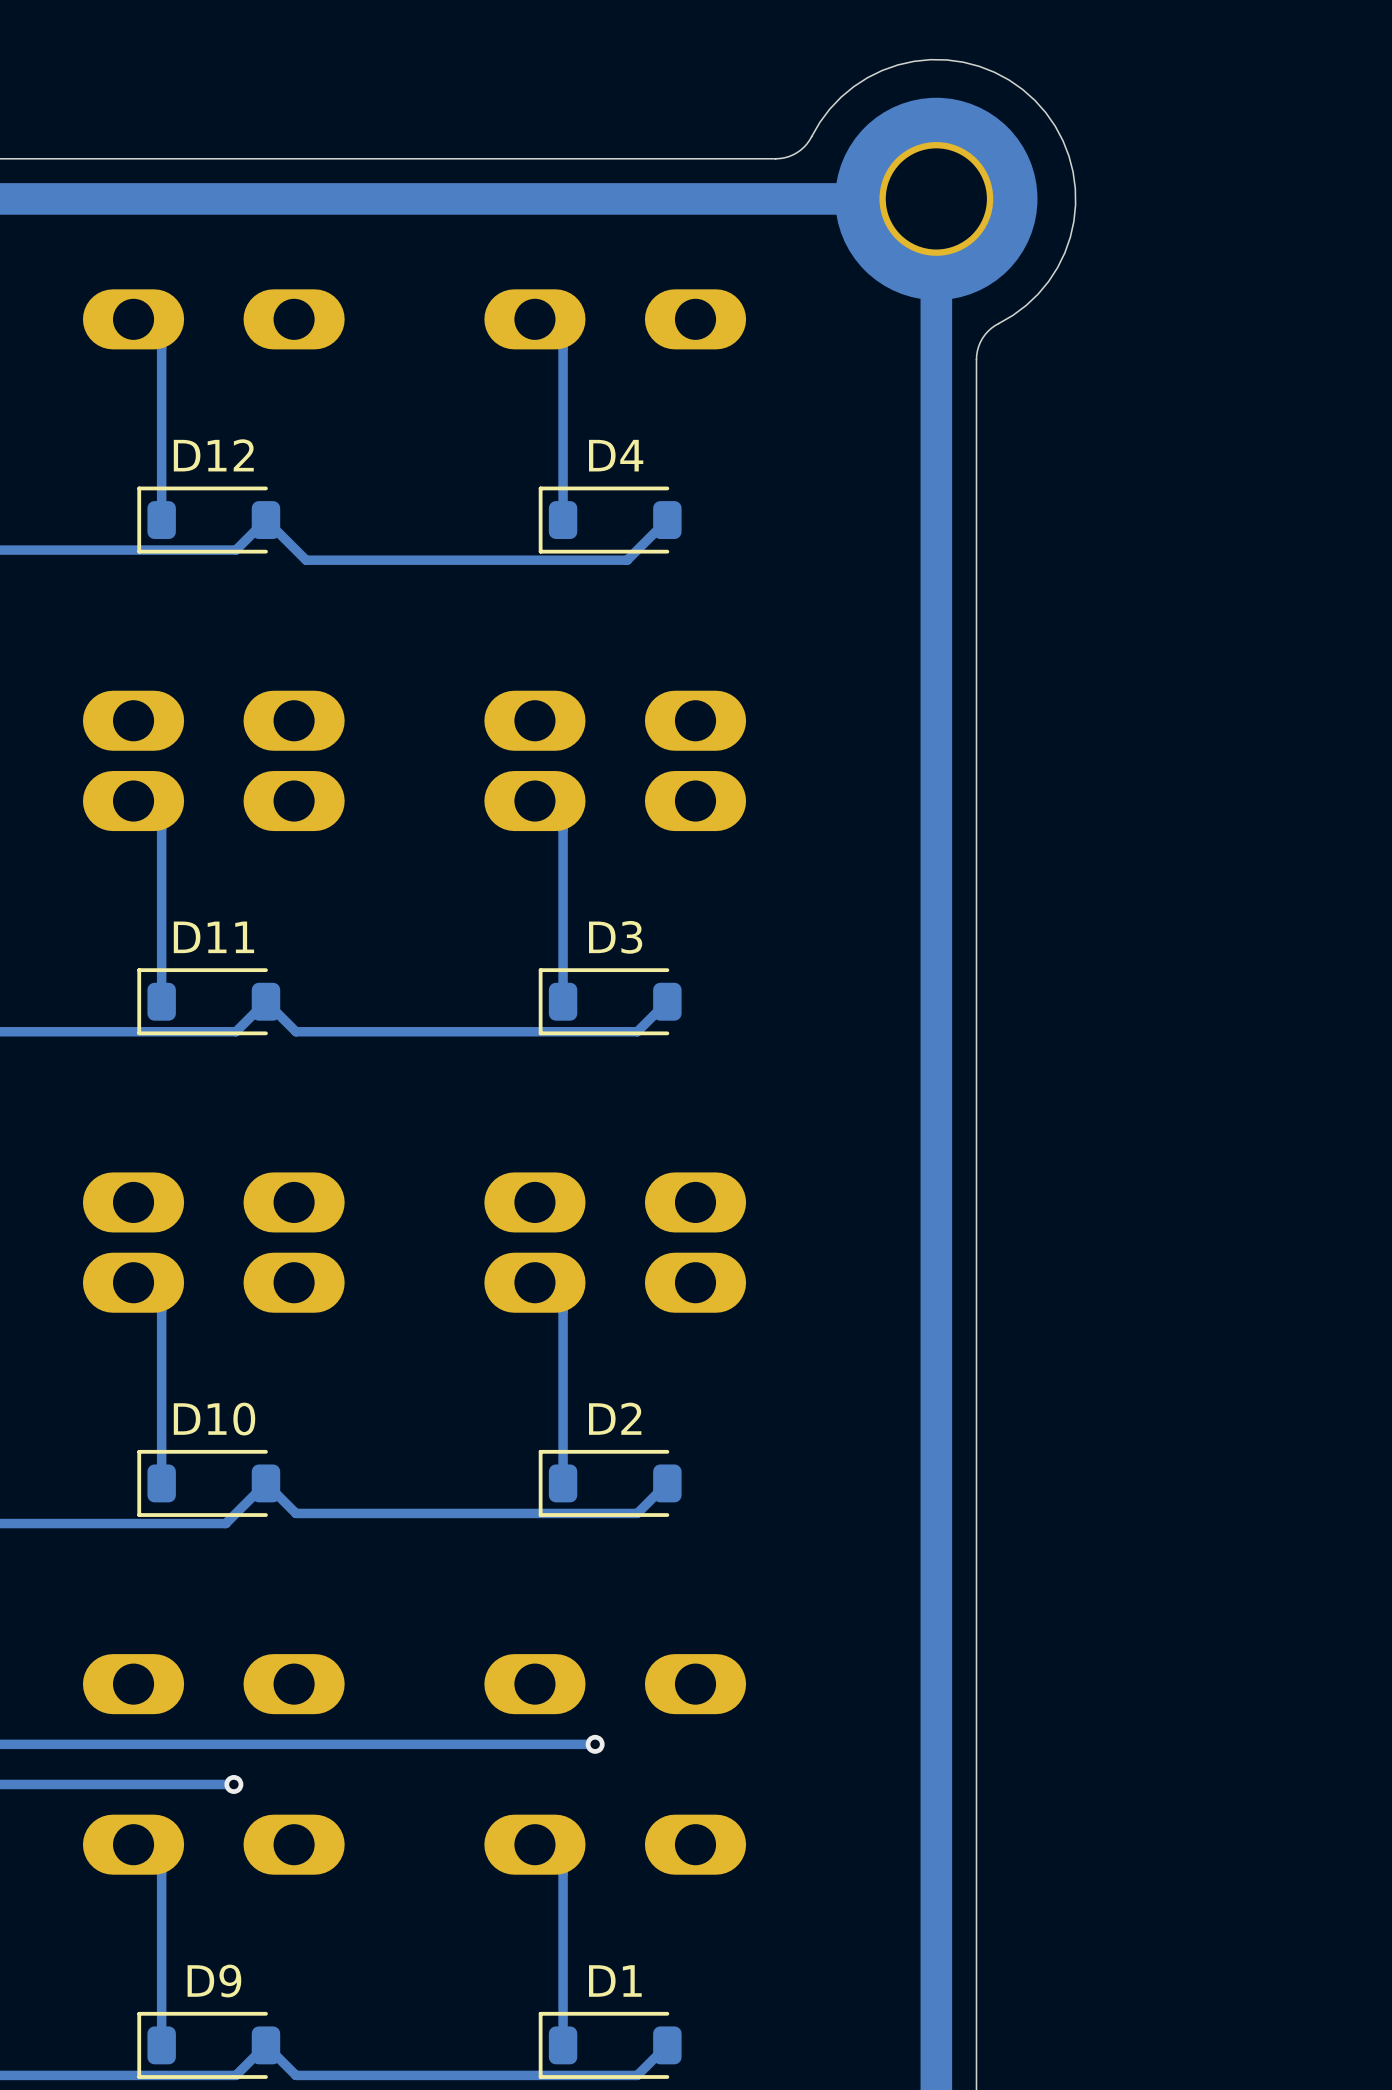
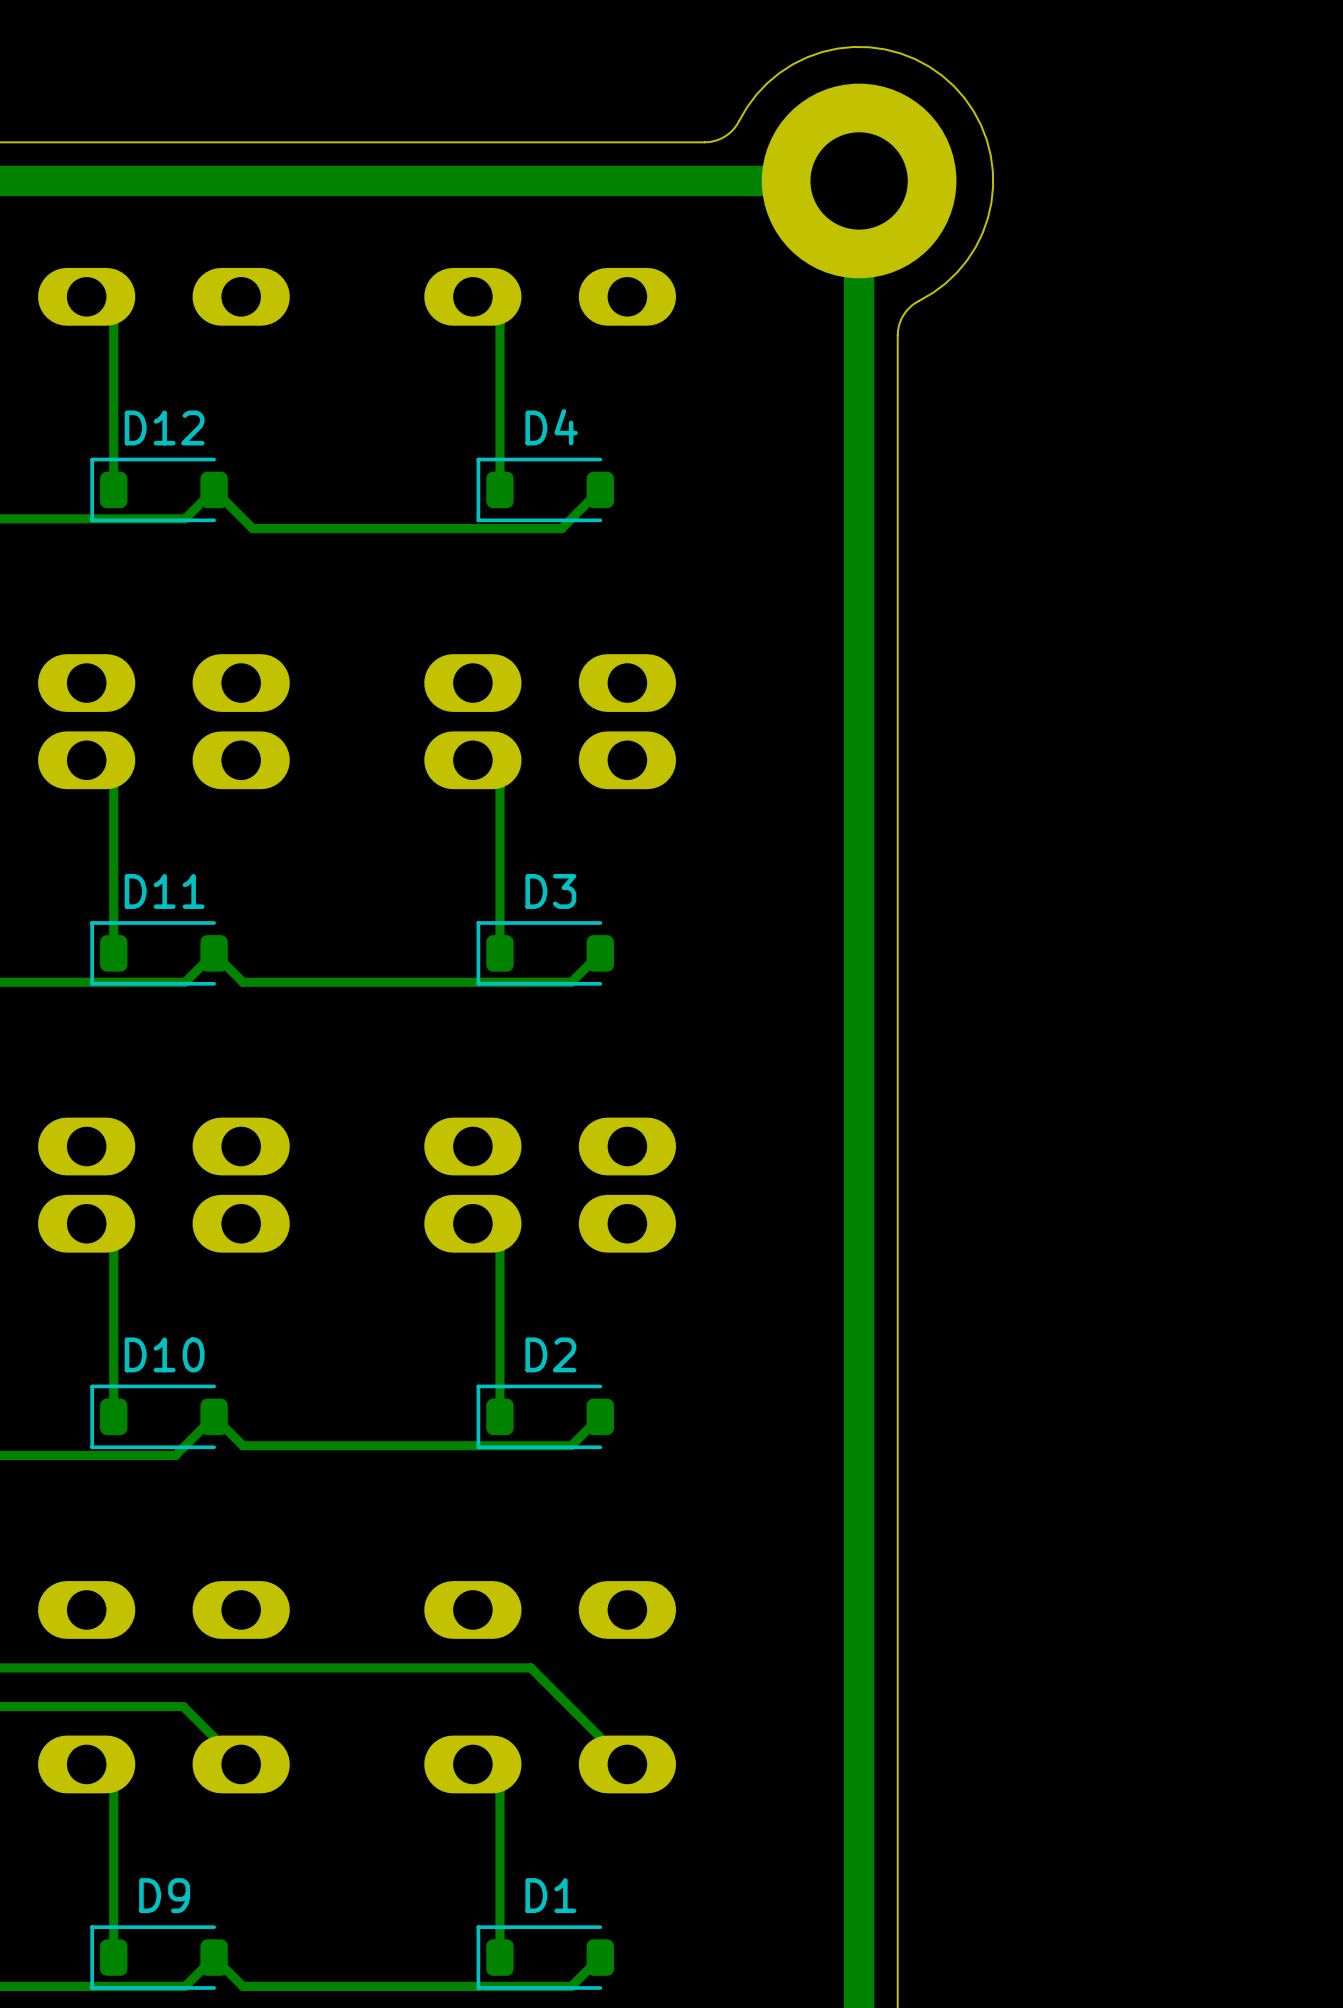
part footprint: [835, 97, 1038, 301] -> [761, 83, 957, 279]
track: none -> (530, 1667) (627, 1764)
via: (595, 1744) -> none
track: none -> (183, 1706) (241, 1764)
via: (233, 1784) -> none

